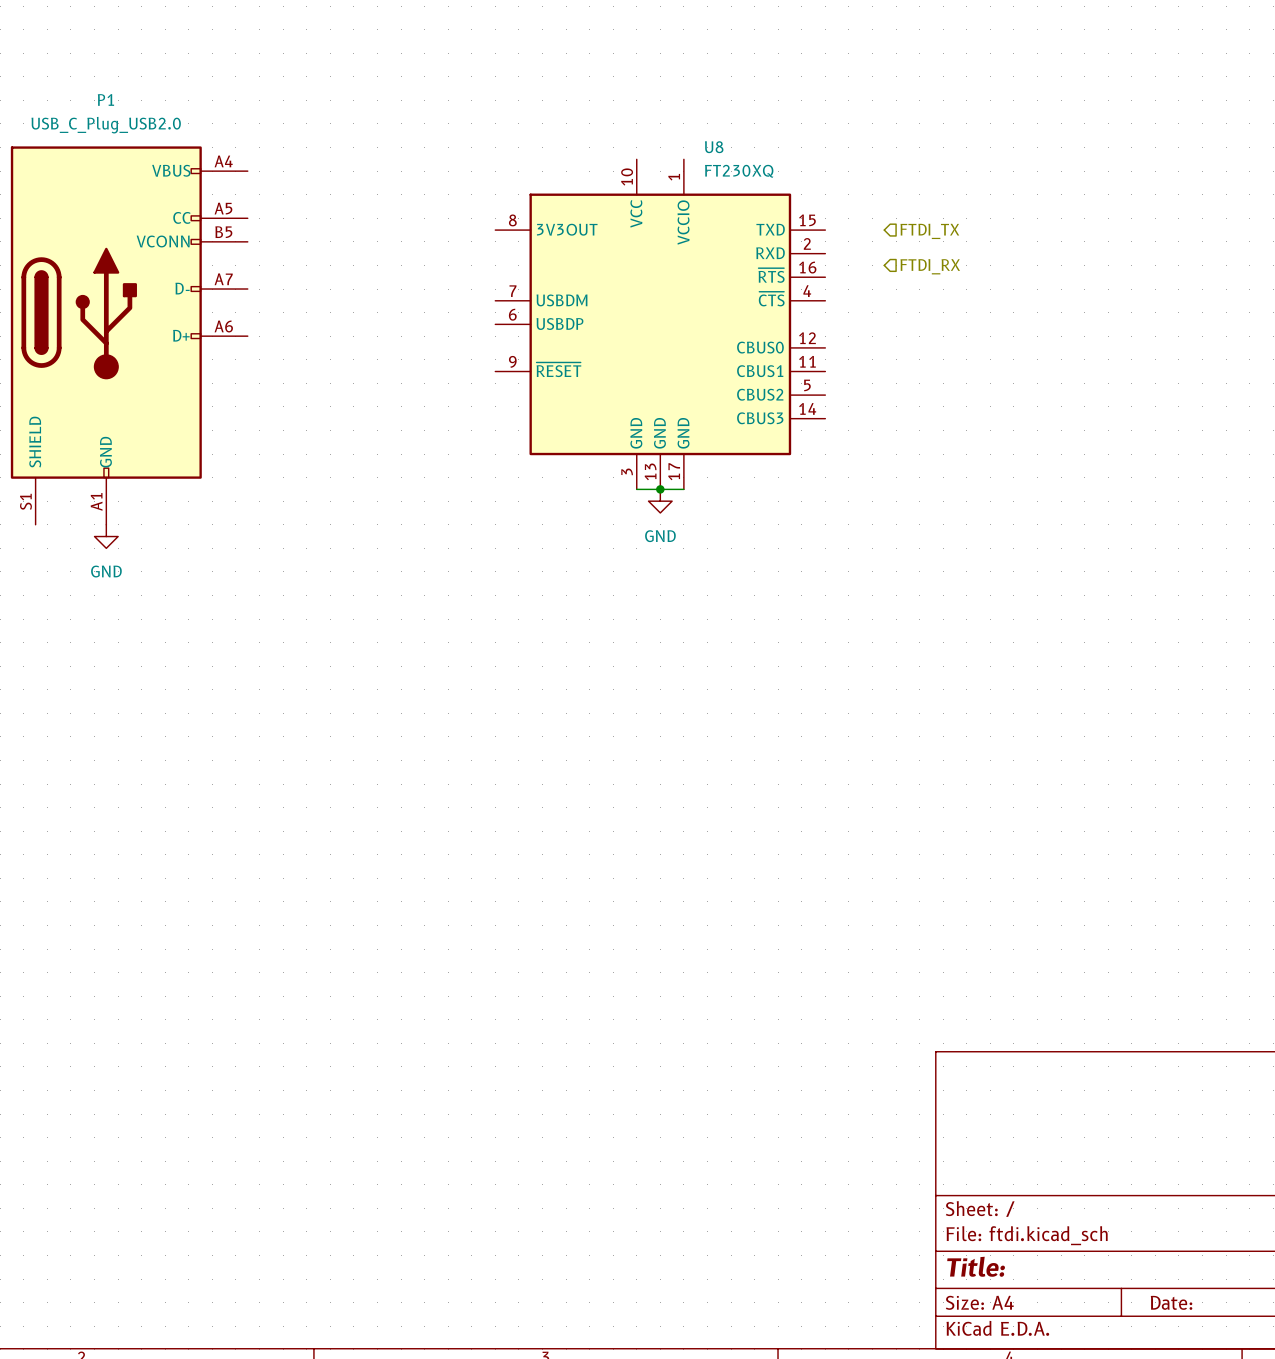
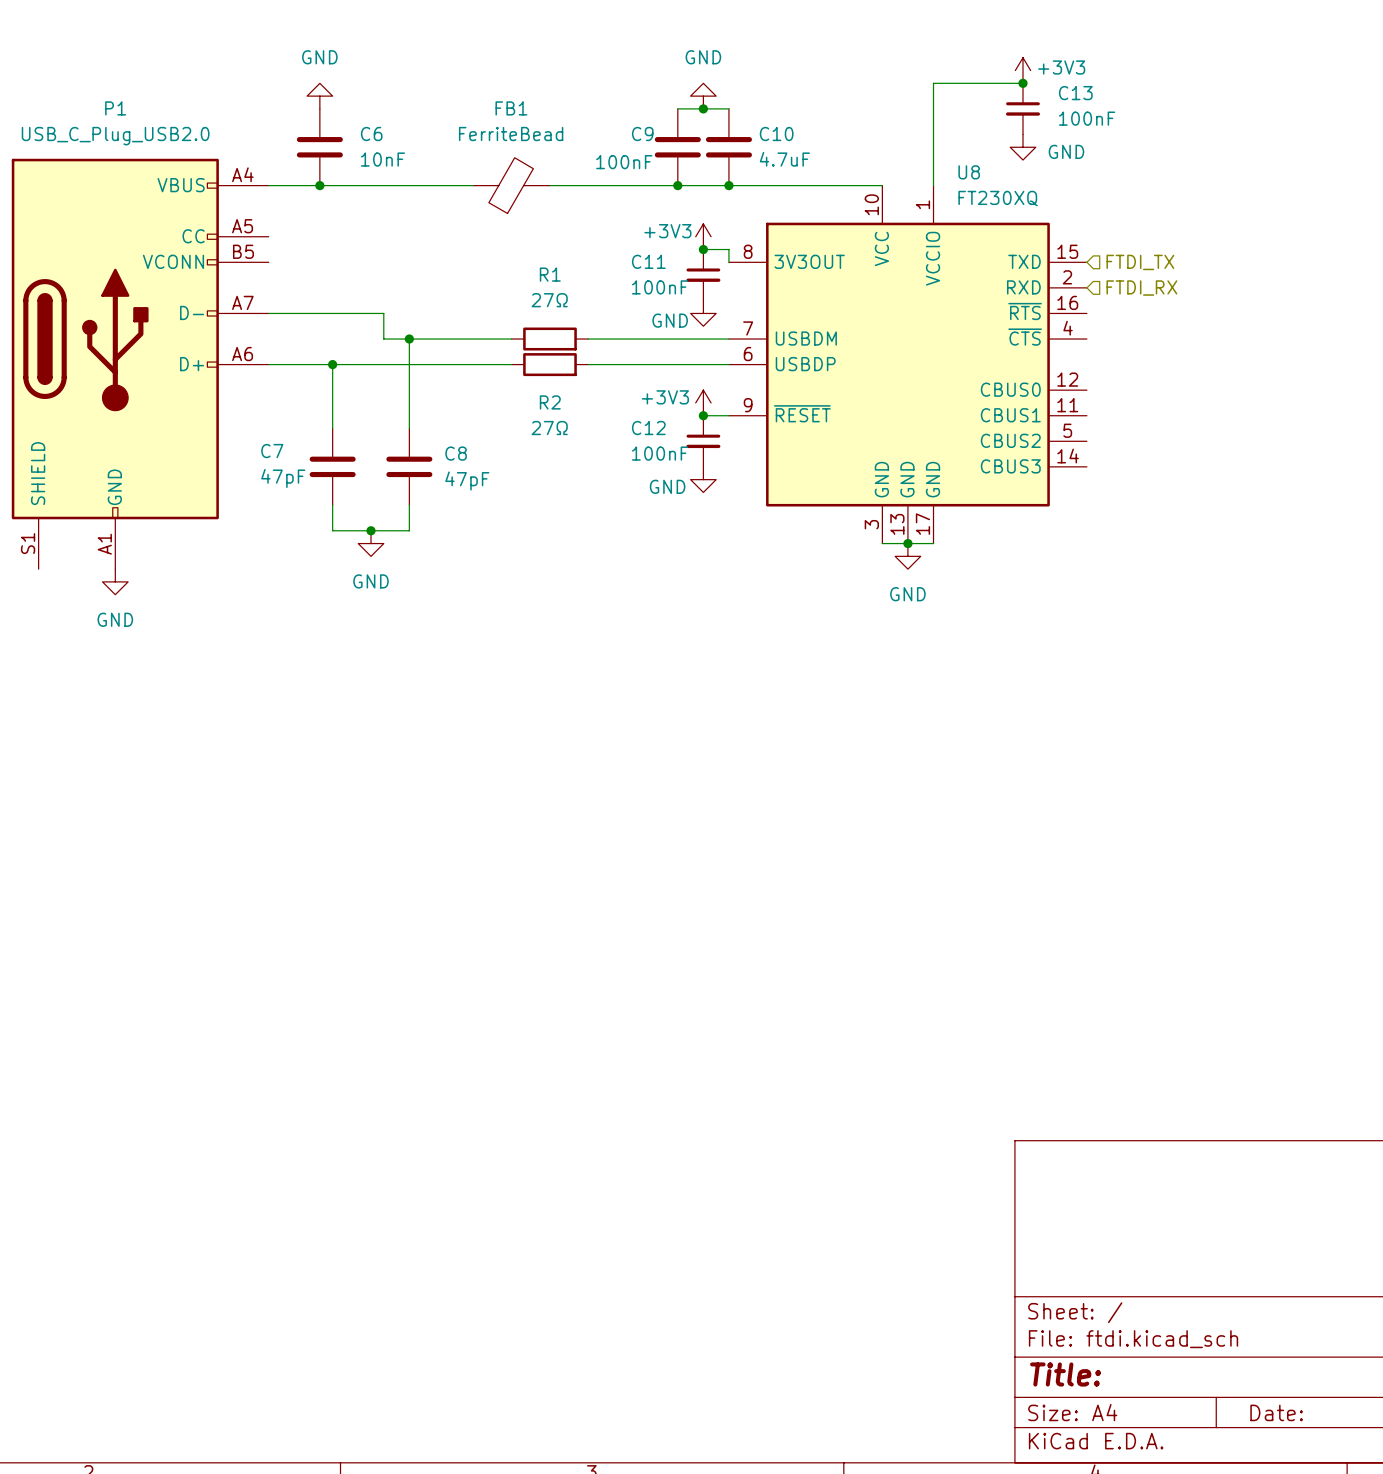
power symbol: none -> +3V3 (1022, 70)
wire: none -> (1022, 83) (933, 83) (933, 185)
junction: none -> (1022, 83)
power symbol: none -> GND (319, 96)
power symbol: none -> GND (703, 96)
wire: none -> (677, 108) (728, 108)
junction: none -> (703, 108)
C13: none -> 100nF (1022, 108)
C6: none -> 10nF (319, 147)
C9: none -> 100nF (677, 147)
C10: none -> 4.7uF (728, 147)
power symbol: none -> GND (1022, 147)
wire: none -> (268, 185) (473, 185)
junction: none -> (319, 185)
FB1: none -> FerriteBead (511, 185)
wire: none -> (549, 185) (882, 185)
junction: none -> (677, 185)
junction: none -> (728, 185)
power symbol: none -> +3V3 (703, 236)
junction: none -> (703, 249)
hierarchical label position: FTDI_TX (929, 231) -> FTDI_TX (1140, 262)
C11: none -> 100nF (703, 275)
hierarchical label position: FTDI_RX (930, 266) -> FTDI_RX (1141, 288)
wire: none -> (268, 313) (383, 313) (383, 339) (511, 339)
power symbol: none -> GND (703, 313)
wire: none -> (409, 339) (409, 428)
junction: none -> (409, 339)
R1: none -> 27Ω (549, 339)
U8 position: (660, 324) -> (907, 364)
wire: none -> (268, 364) (511, 364)
wire: none -> (332, 364) (332, 428)
junction: none -> (332, 364)
R2: none -> 27Ω (549, 364)
power symbol: none -> +3V3 (703, 402)
junction: none -> (703, 415)
C12: none -> 100nF (703, 441)
C7: none -> 47pF (332, 466)
C8: none -> 47pF (409, 466)
wire: none -> (332, 505) (332, 530) (409, 530) (409, 505)
junction: none -> (371, 530)
wire: (636, 489) (683, 489) -> (882, 543) (933, 543)
junction: (660, 489) -> none
power symbol: none -> GND (371, 543)
power symbol position: GND (660, 501) -> GND (703, 479)
junction: none -> (907, 543)
power symbol: none -> GND (907, 556)
power symbol text position: GND (660, 536) -> GND (667, 486)

